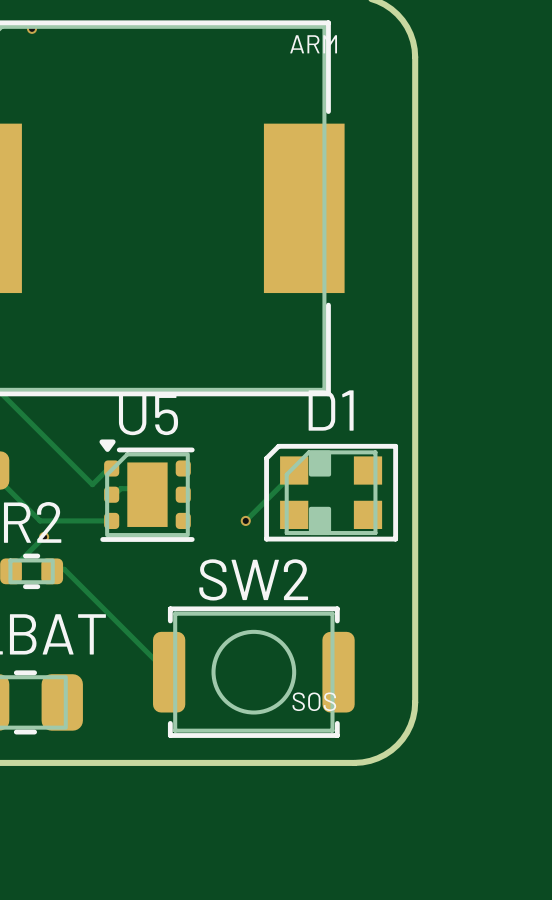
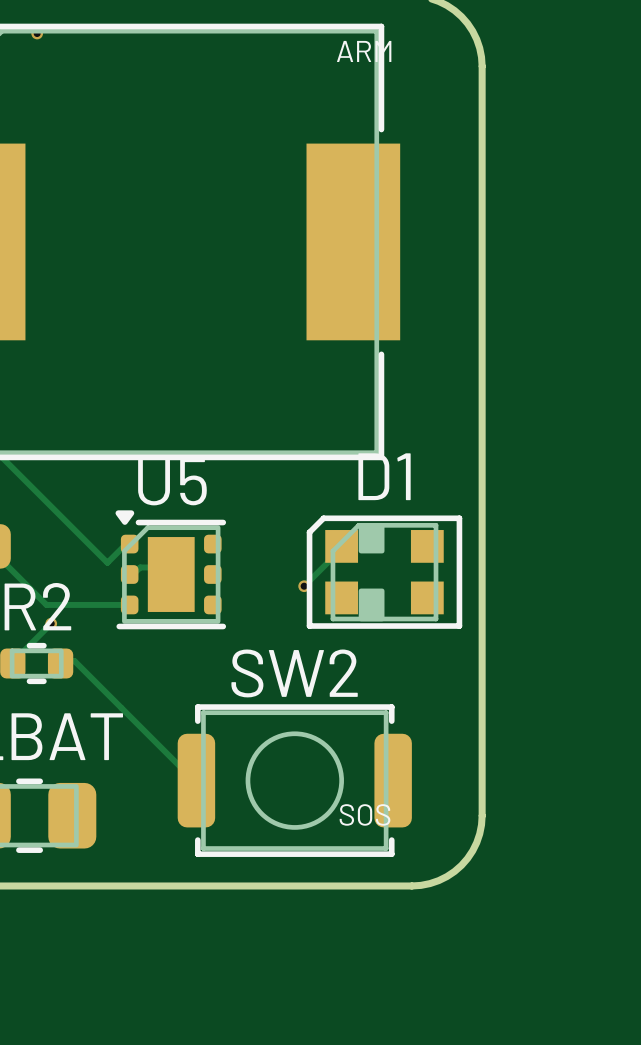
track: (261, 504) (245, 520) -> none
via position: (245, 520) -> (304, 586)

